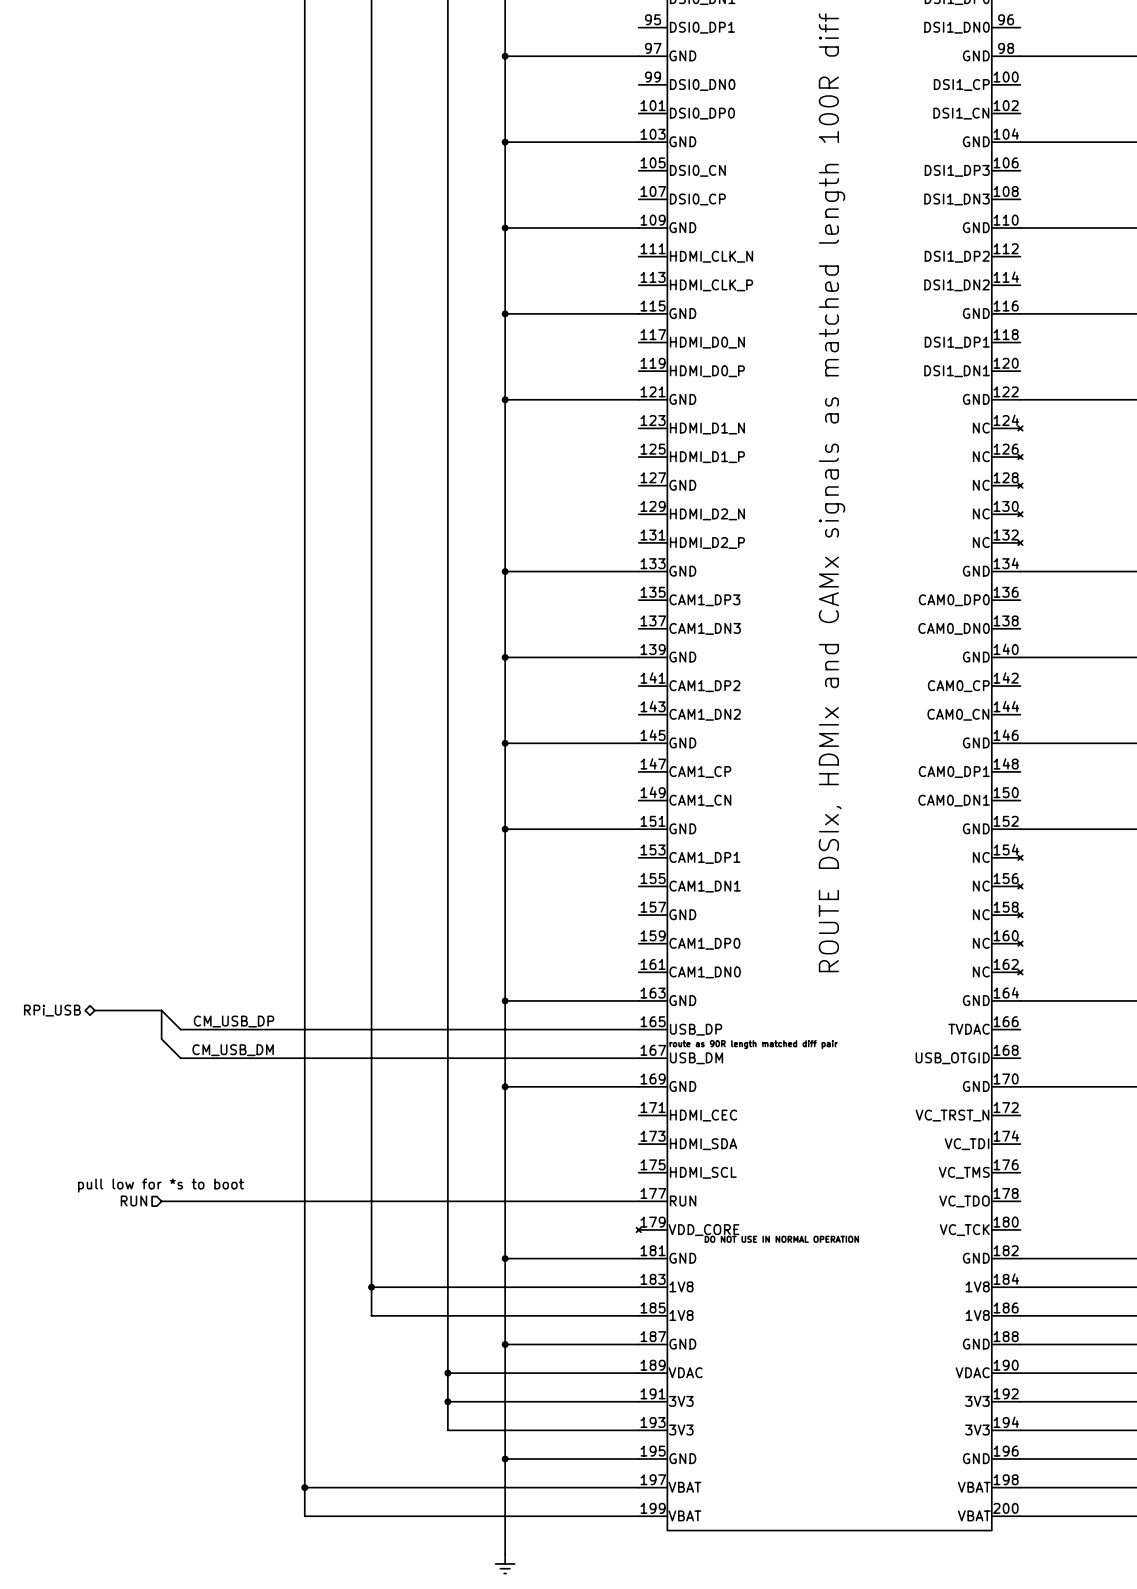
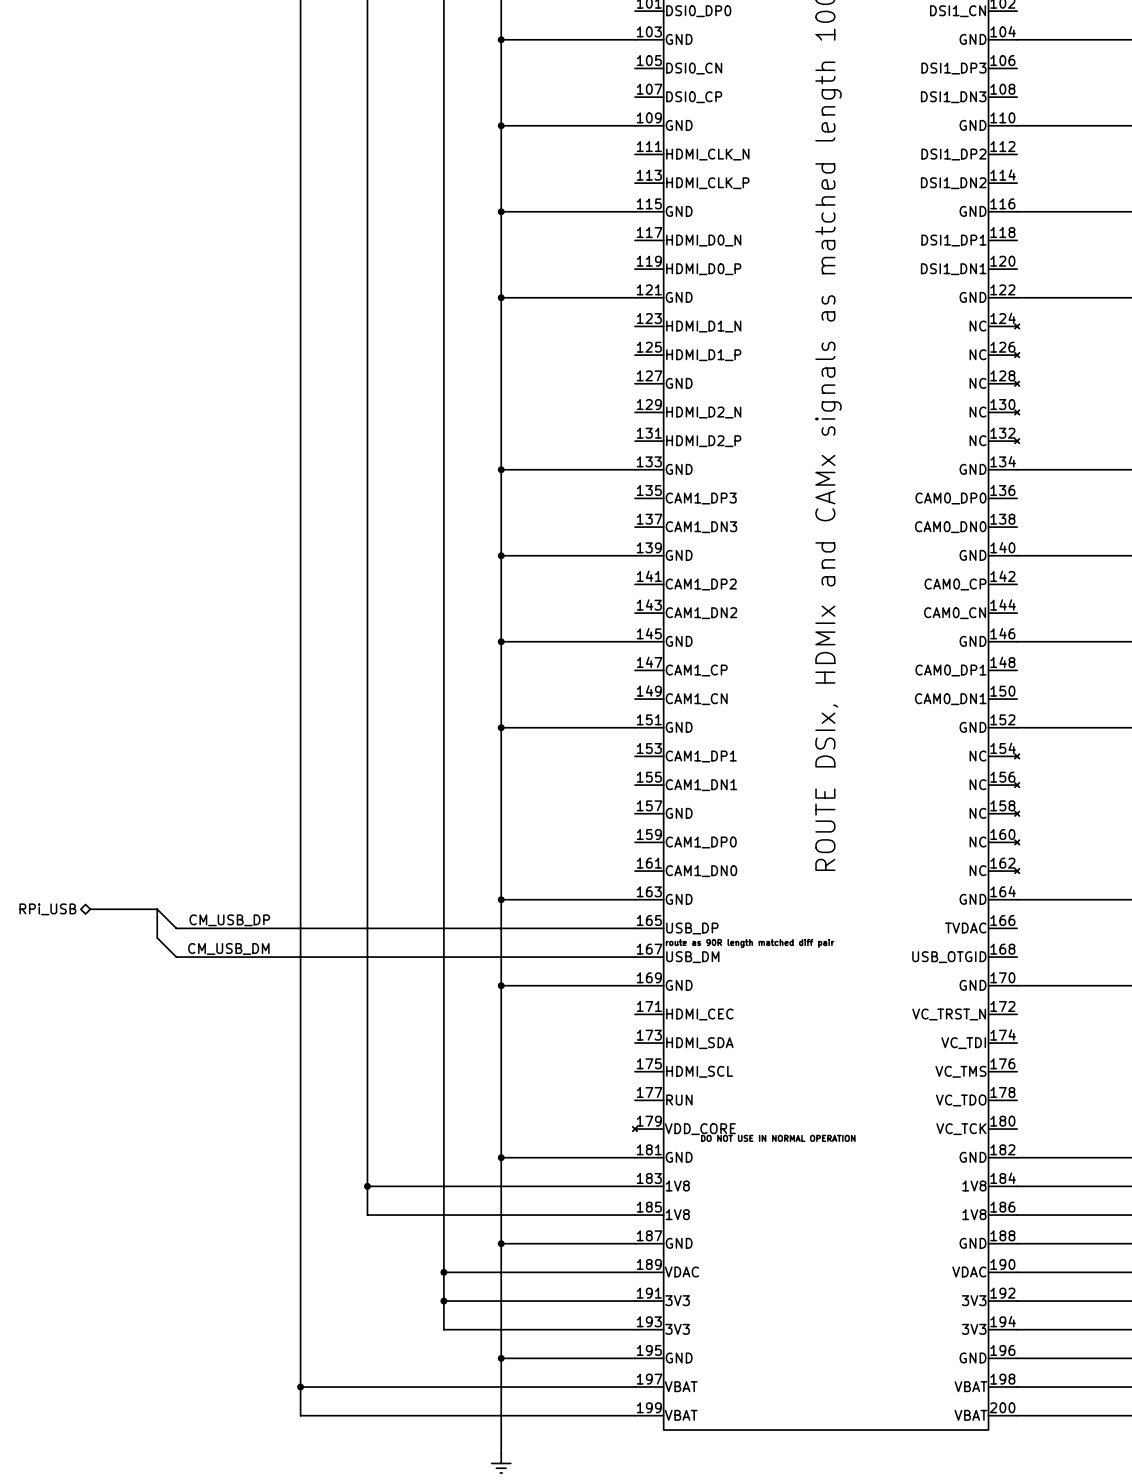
text: pull low for *s to boot (161, 1185) -> none
hierarchical label: RUN (133, 1200) -> none
wire: (161, 1201) (638, 1201) -> none

